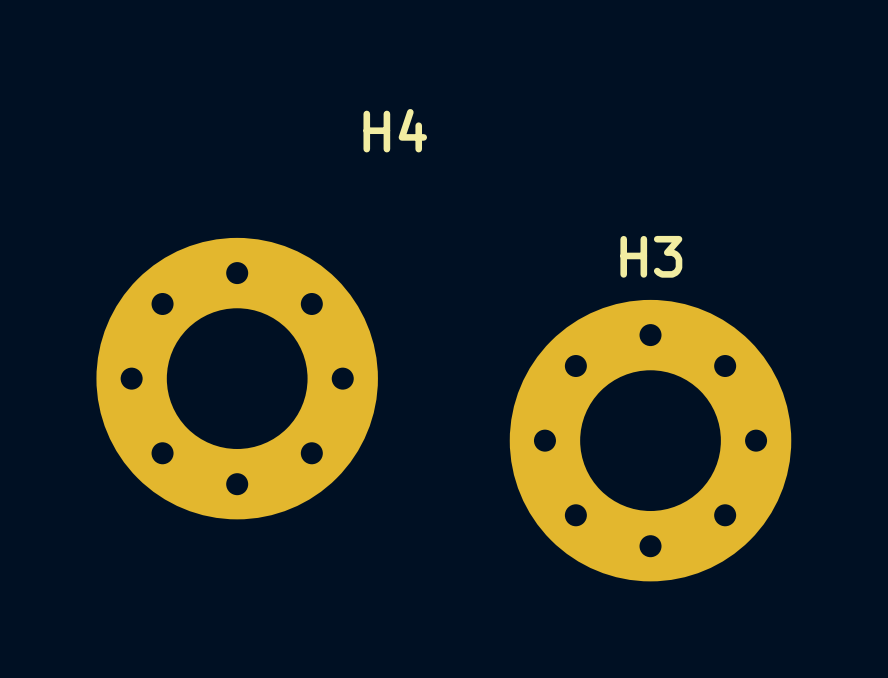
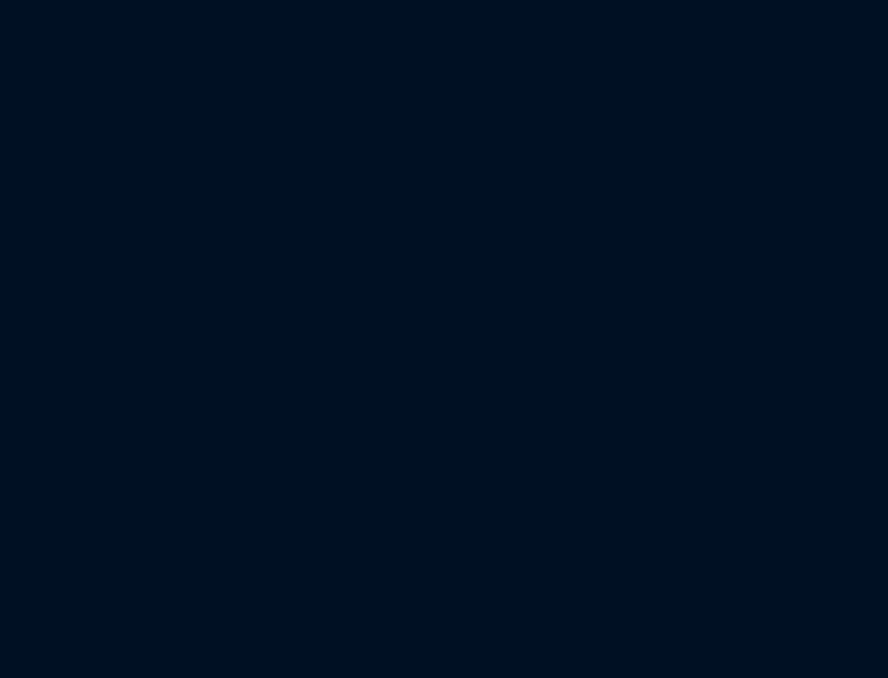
H4: (237, 378) -> none
H3: (650, 440) -> none

